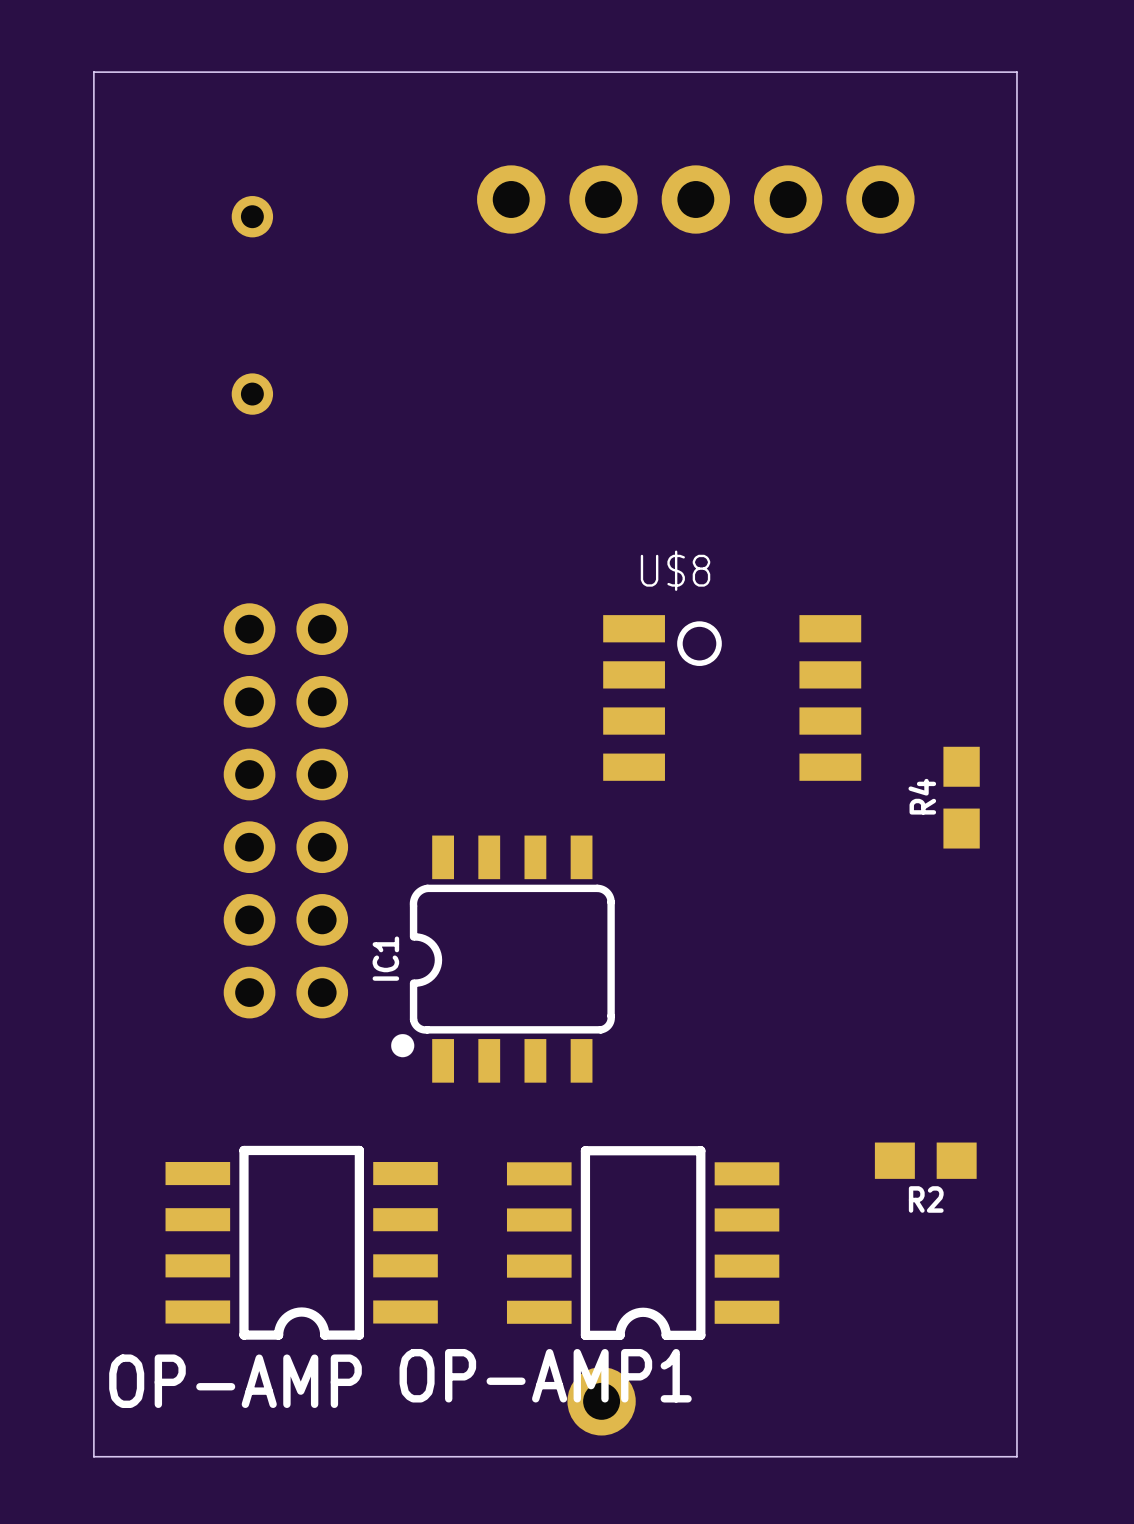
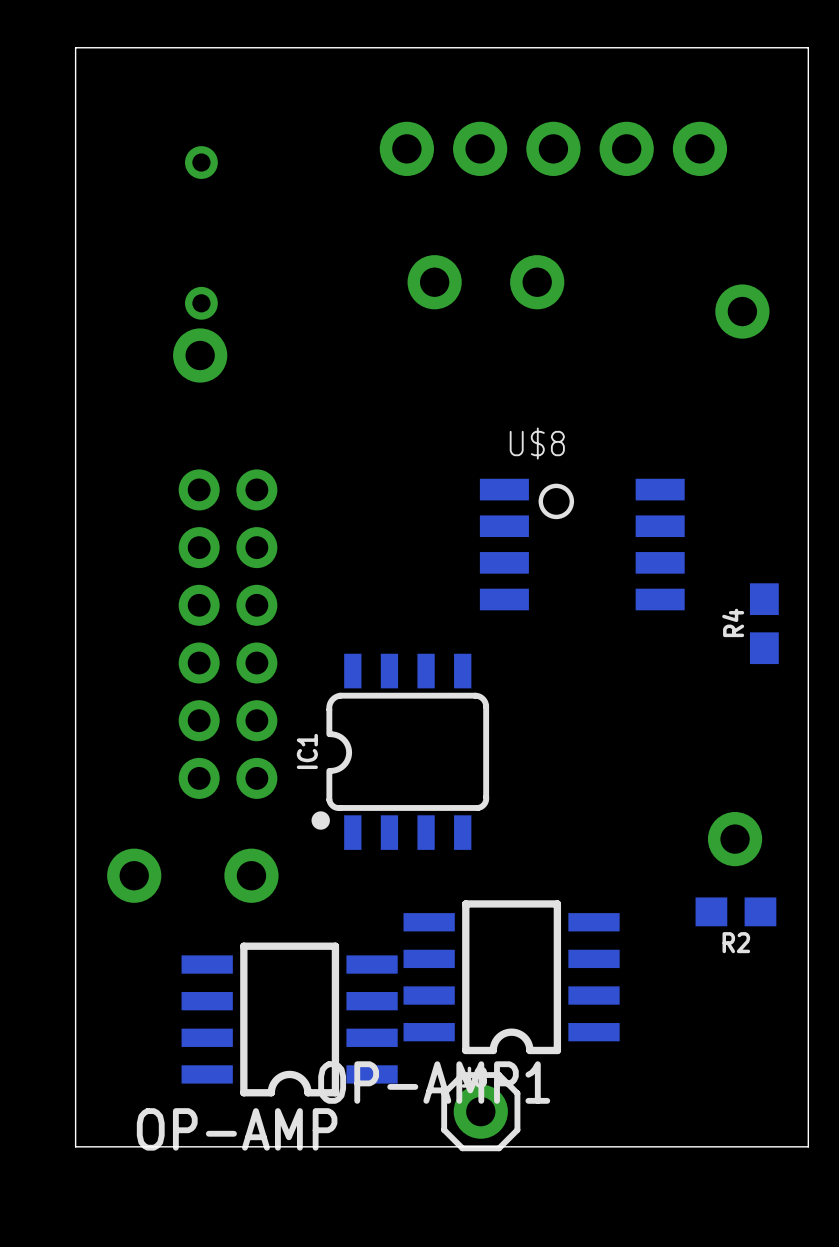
part: none -> (434, 282)
part: none -> (537, 282)
part: none -> (742, 311)
part: none -> (200, 355)
part: none -> (735, 839)
part: none -> (134, 875)
part: none -> (251, 875)
OP-AMP position: (301, 1242) -> (289, 1019)
part side: top (601, 1401) -> bottom (480, 1111)

